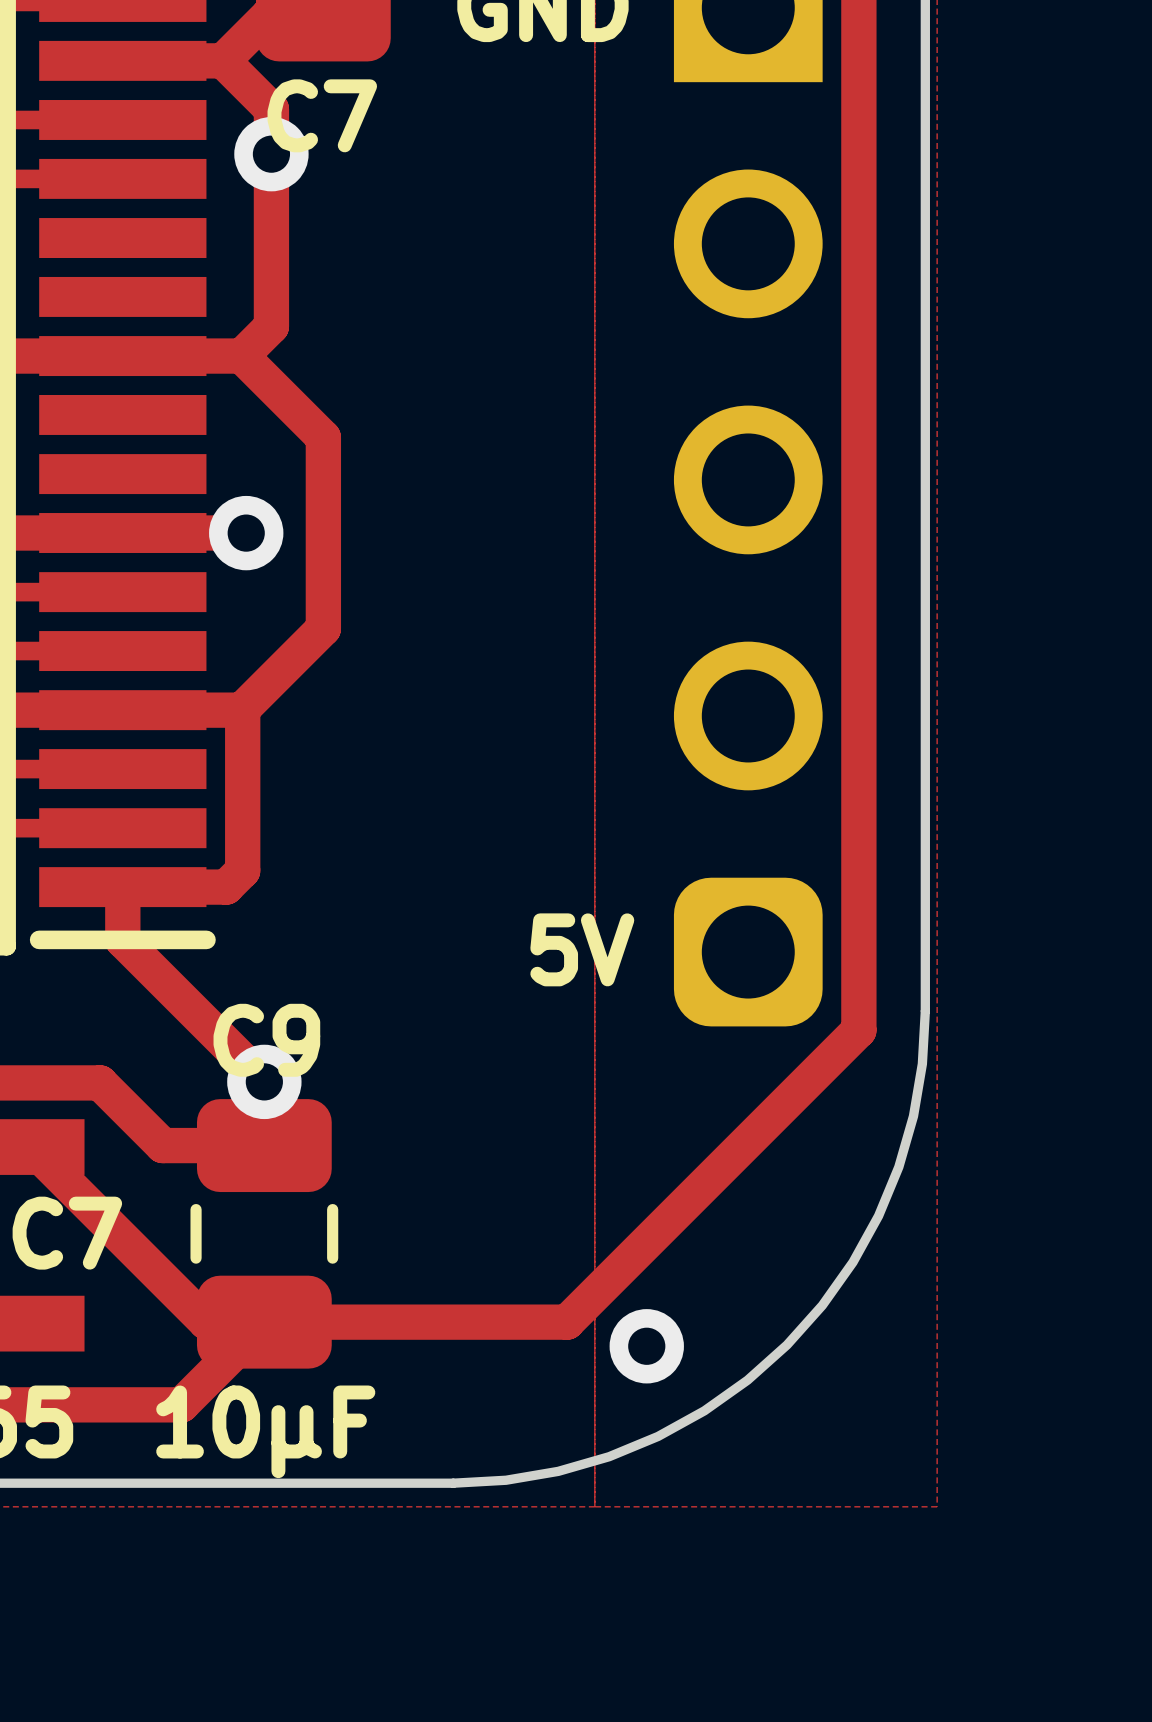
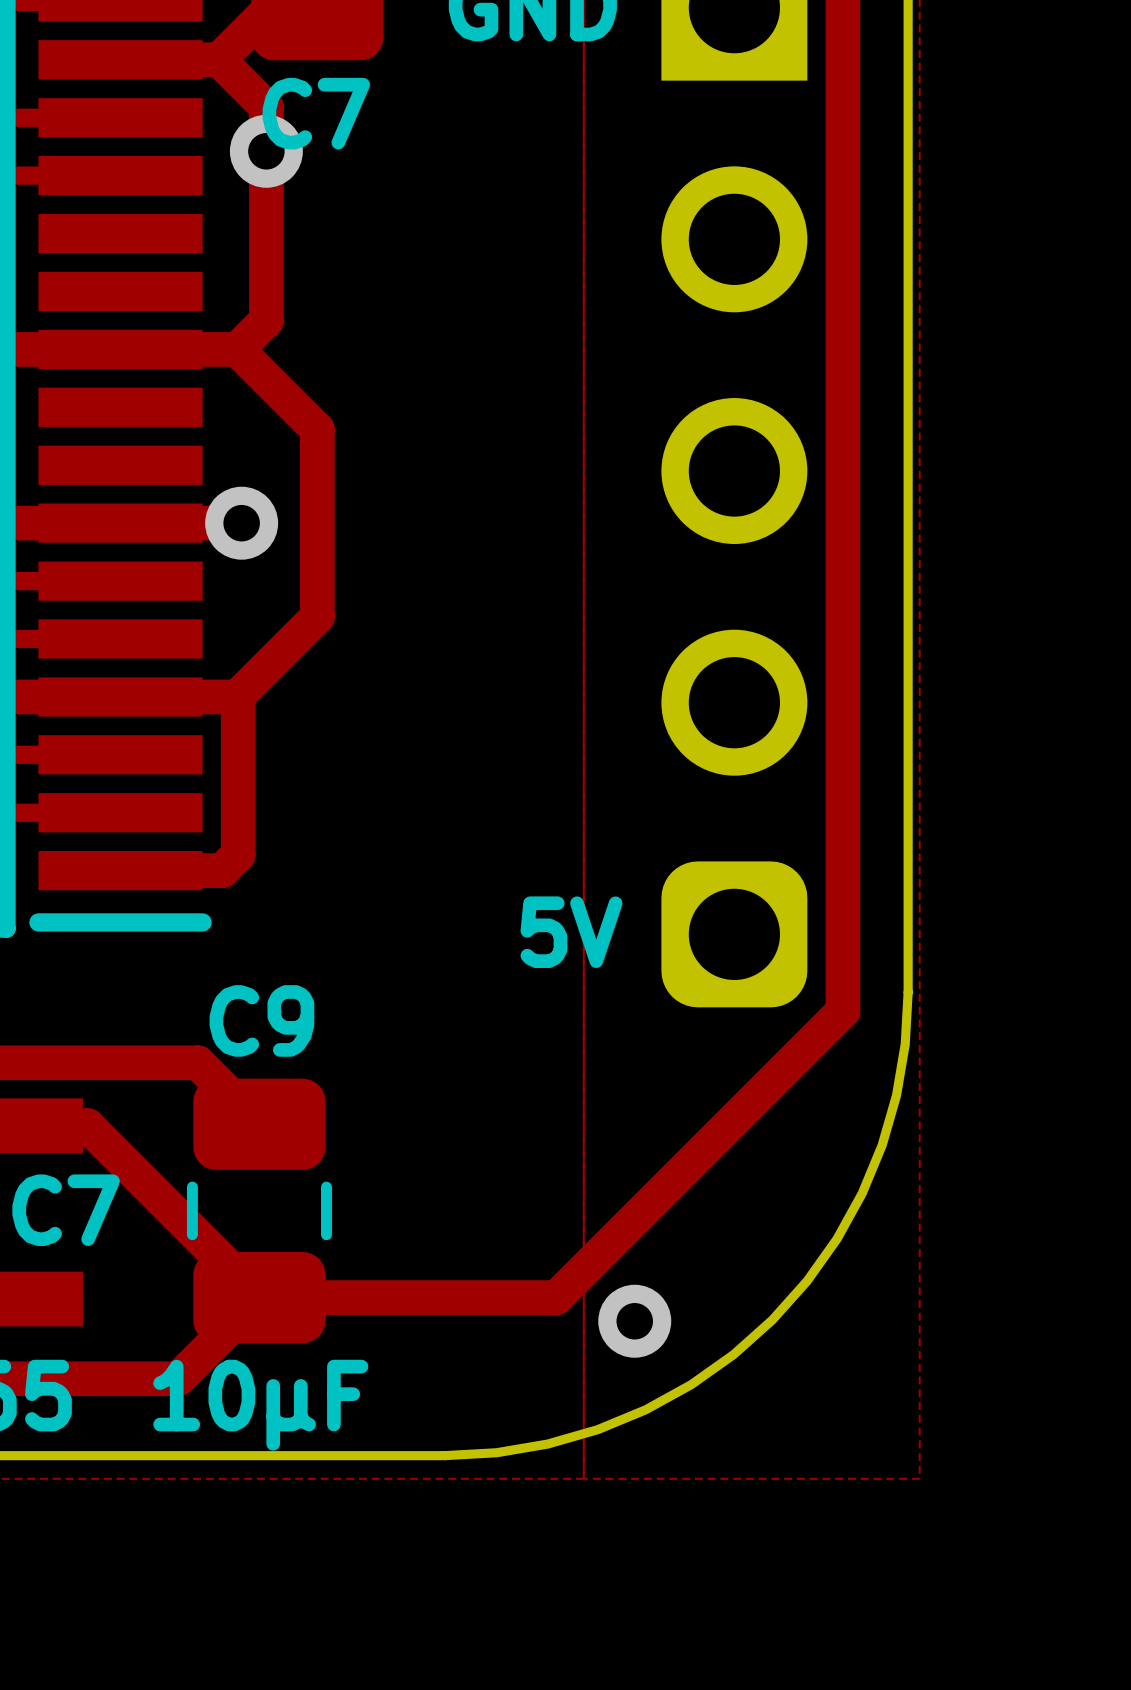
track: (122, 887) (122, 940) (264, 1081) (264, 1145) (162, 1145) (100, 1082) -> (259, 1124) (197, 1062) (98, 1062)
via: (264, 1081) -> none
track: (31, 1147) (206, 1322) (264, 1322) -> (30, 1125) (87, 1125) (259, 1297)

